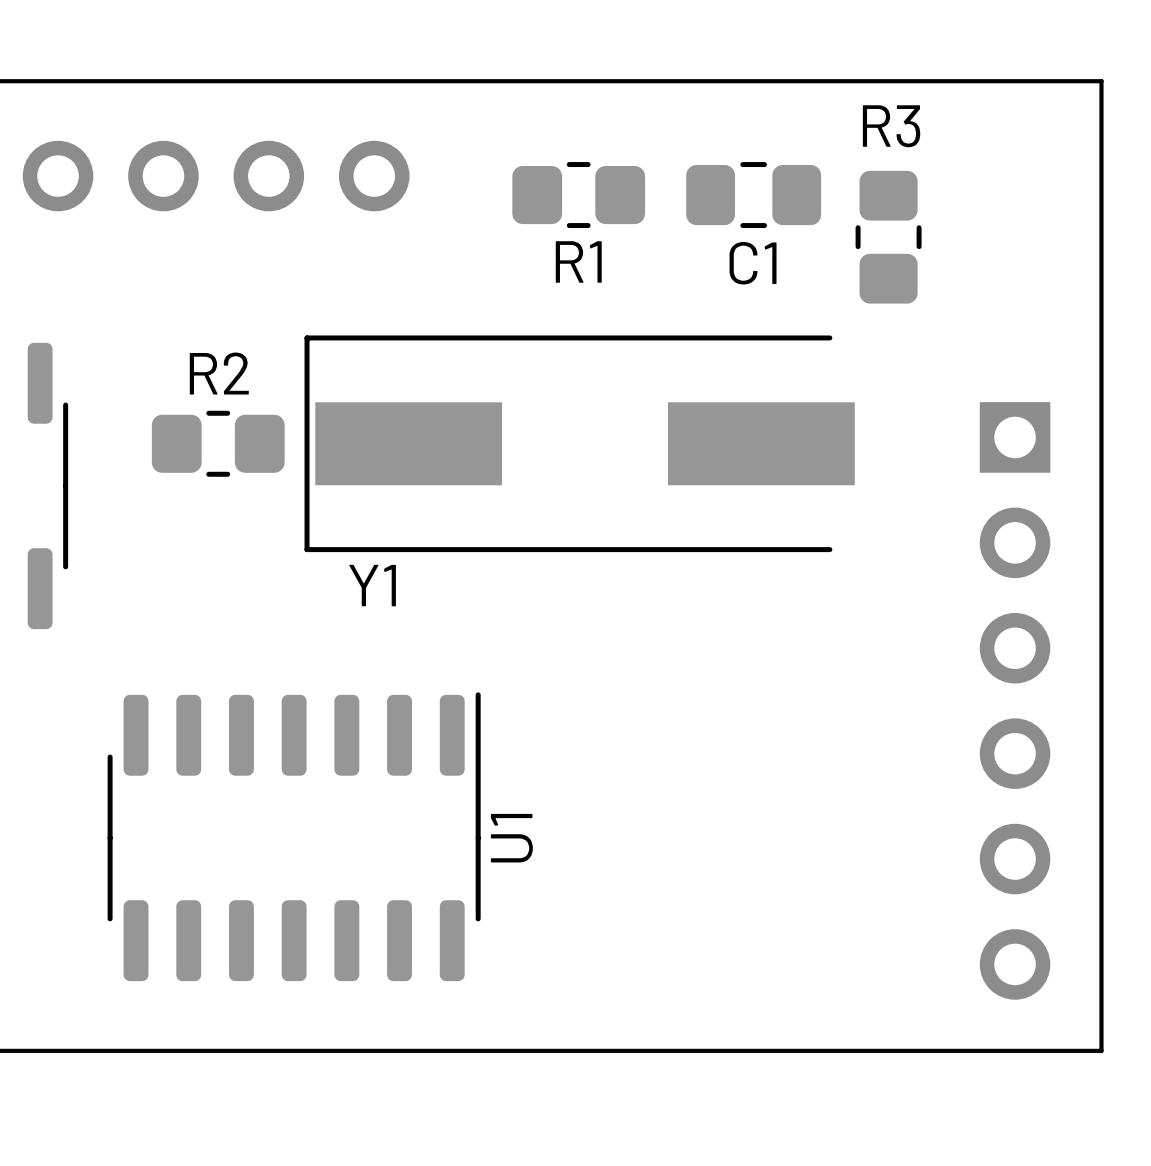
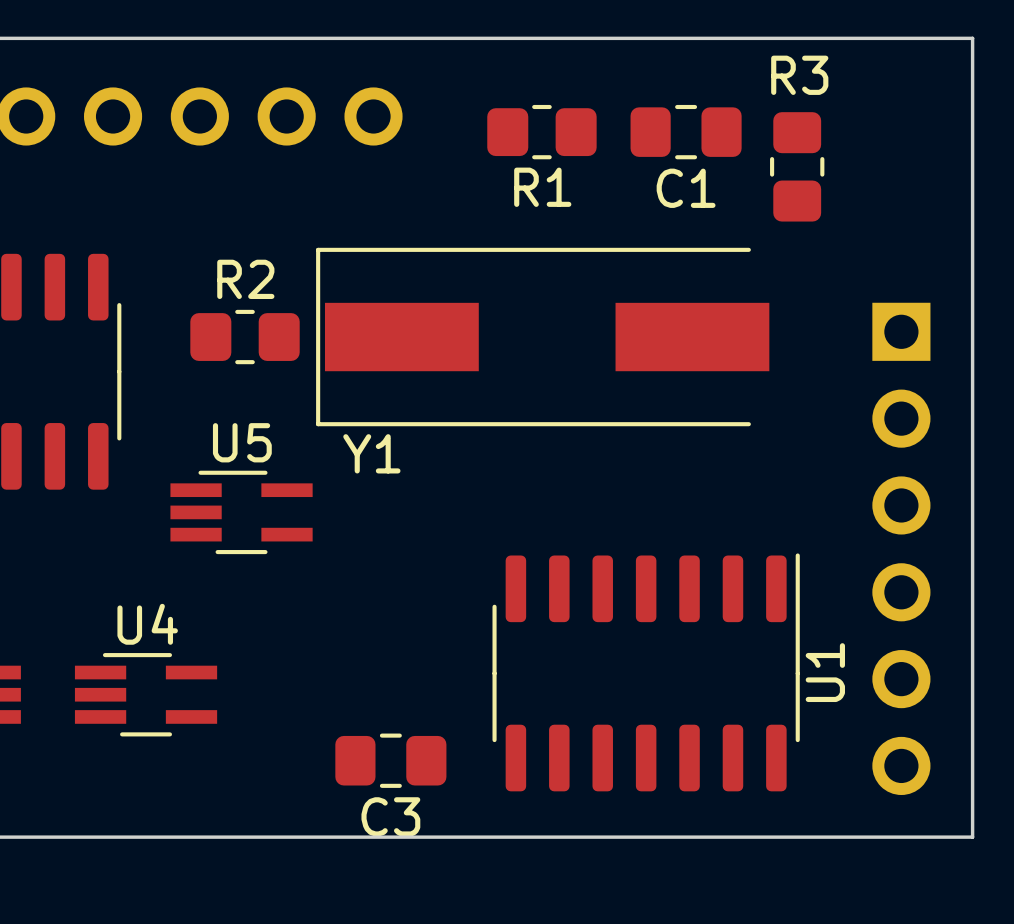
U5: none -> (241, 512)
U1 position: (294, 836) -> (646, 672)
U4: none -> (146, 694)
C3: none -> (390, 760)

